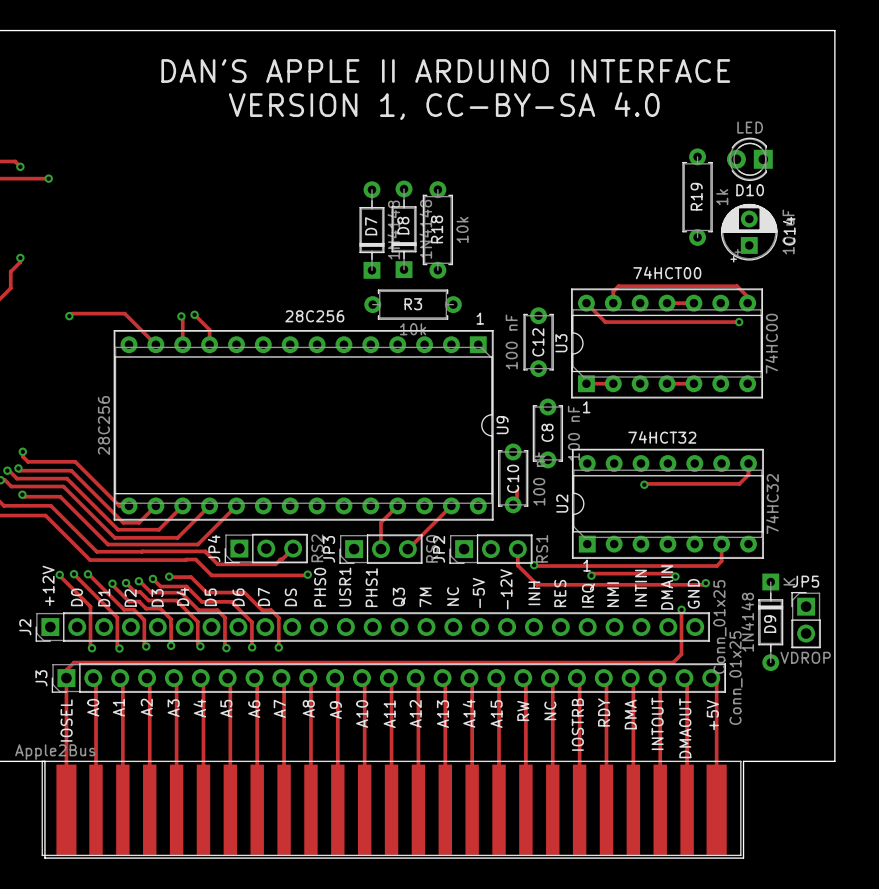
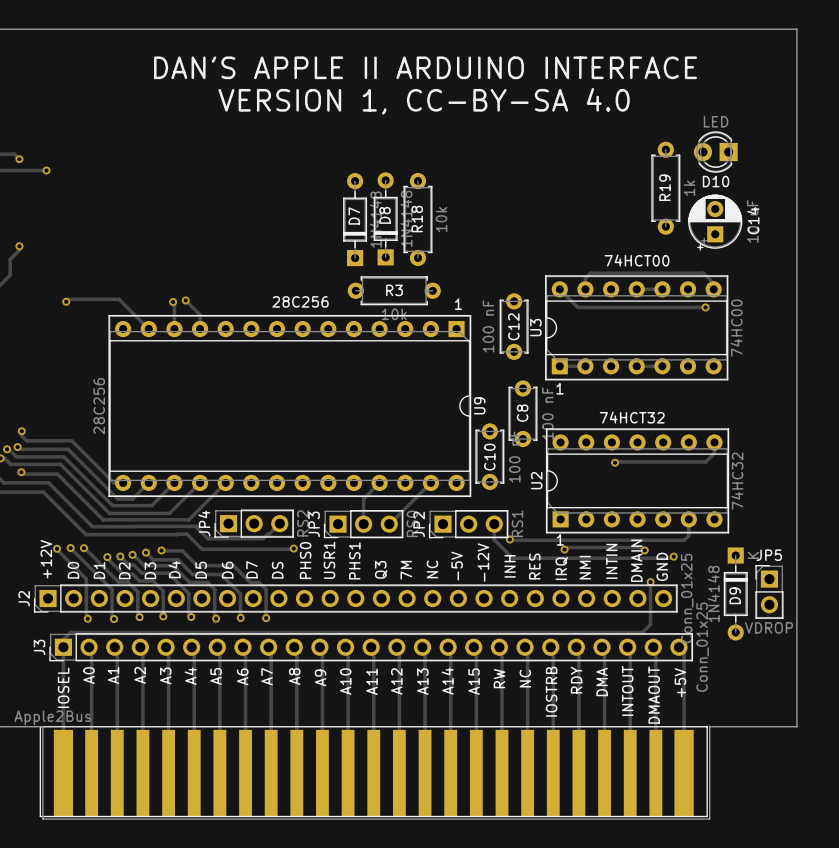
track: (517, 490) (517, 501) (513, 504) -> none

